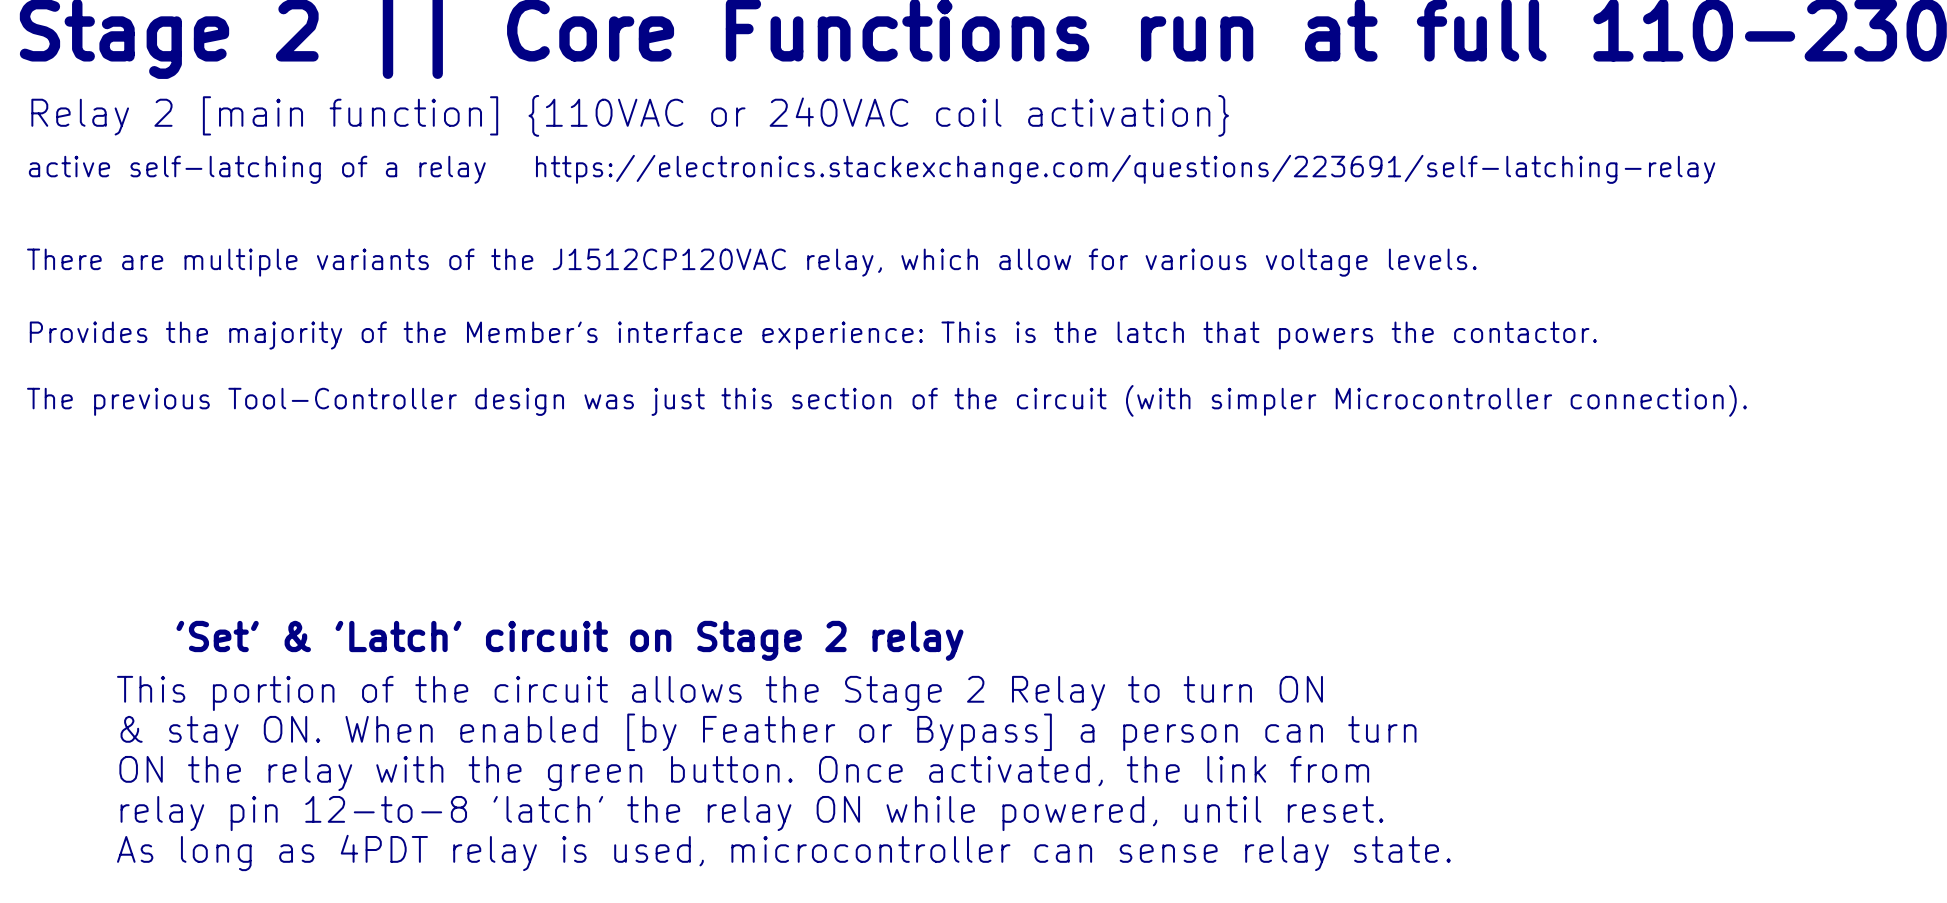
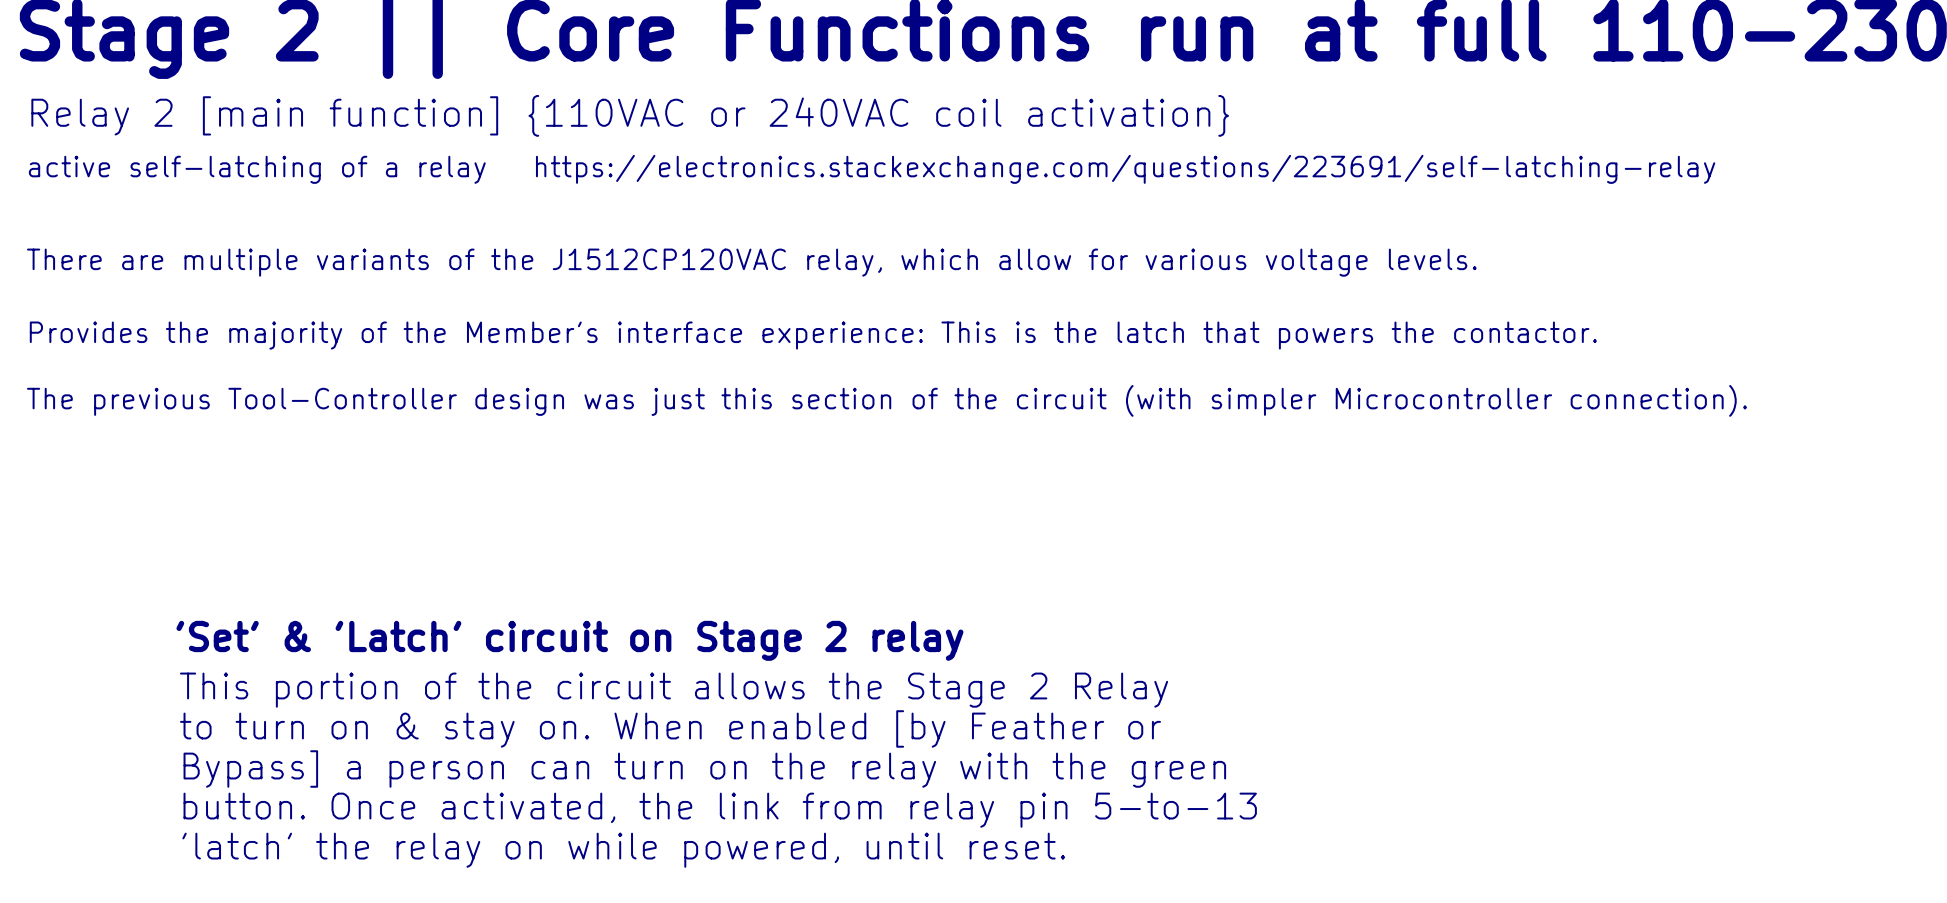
text: This portion of the circuit allows the Stage 2 Relay to turn ON (719, 693) -> This portion of the circuit allows the Stage 2 Relay (674, 690)
text: & stay ON. When enabled [by Feather or Bypass] a person can turn (768, 732) -> to turn on & stay on. When enabled [by Feather or (670, 728)
text: none -> Bypass] a person can turn on the relay with the green (704, 769)
text: ON the relay with the green button. Once activated, the link from (744, 773) -> button. Once activated, the link from relay pin 5-to-13 (720, 810)
text: relay pin 12-to-8 'latch' the relay ON while powered, until reset. (751, 813) -> 'latch' the relay on while powered, until reset. (623, 850)
text: As long as 4PDT relay is used, microcontroller can sense relay state. (783, 852) -> none

